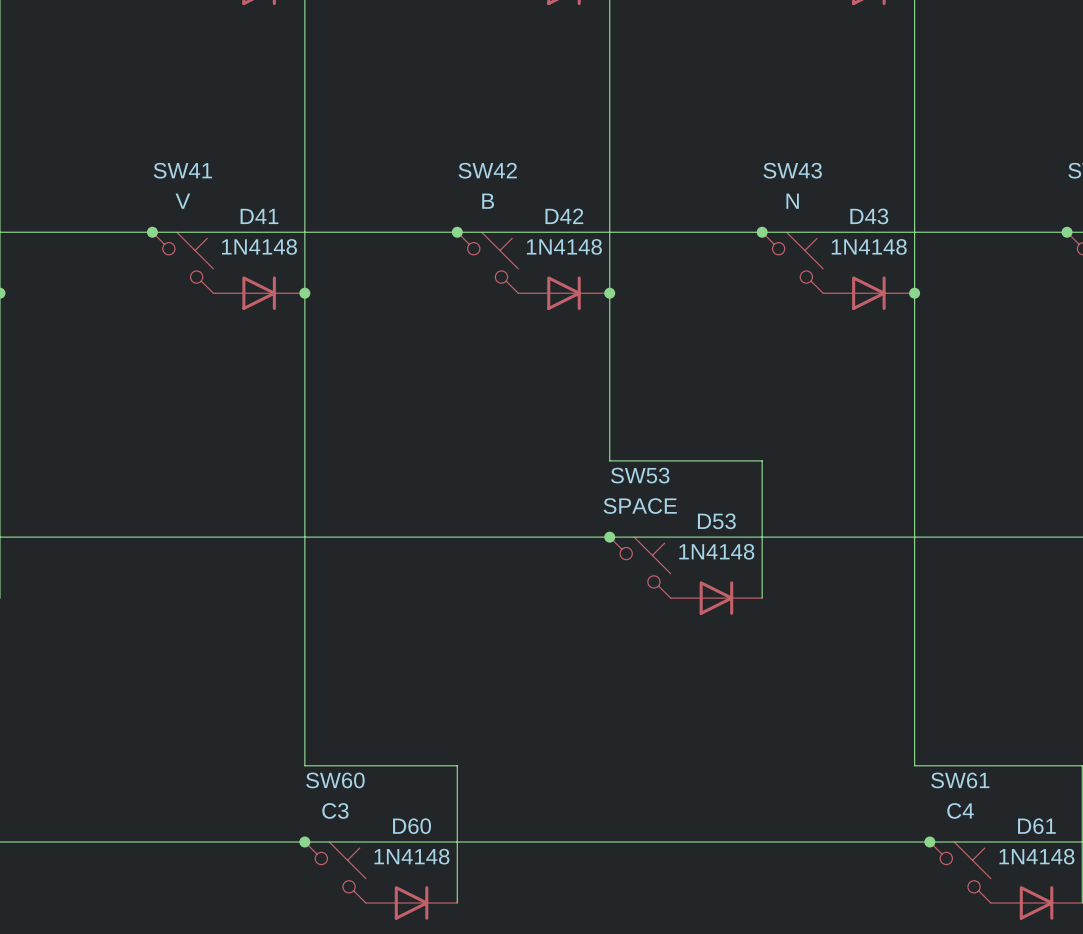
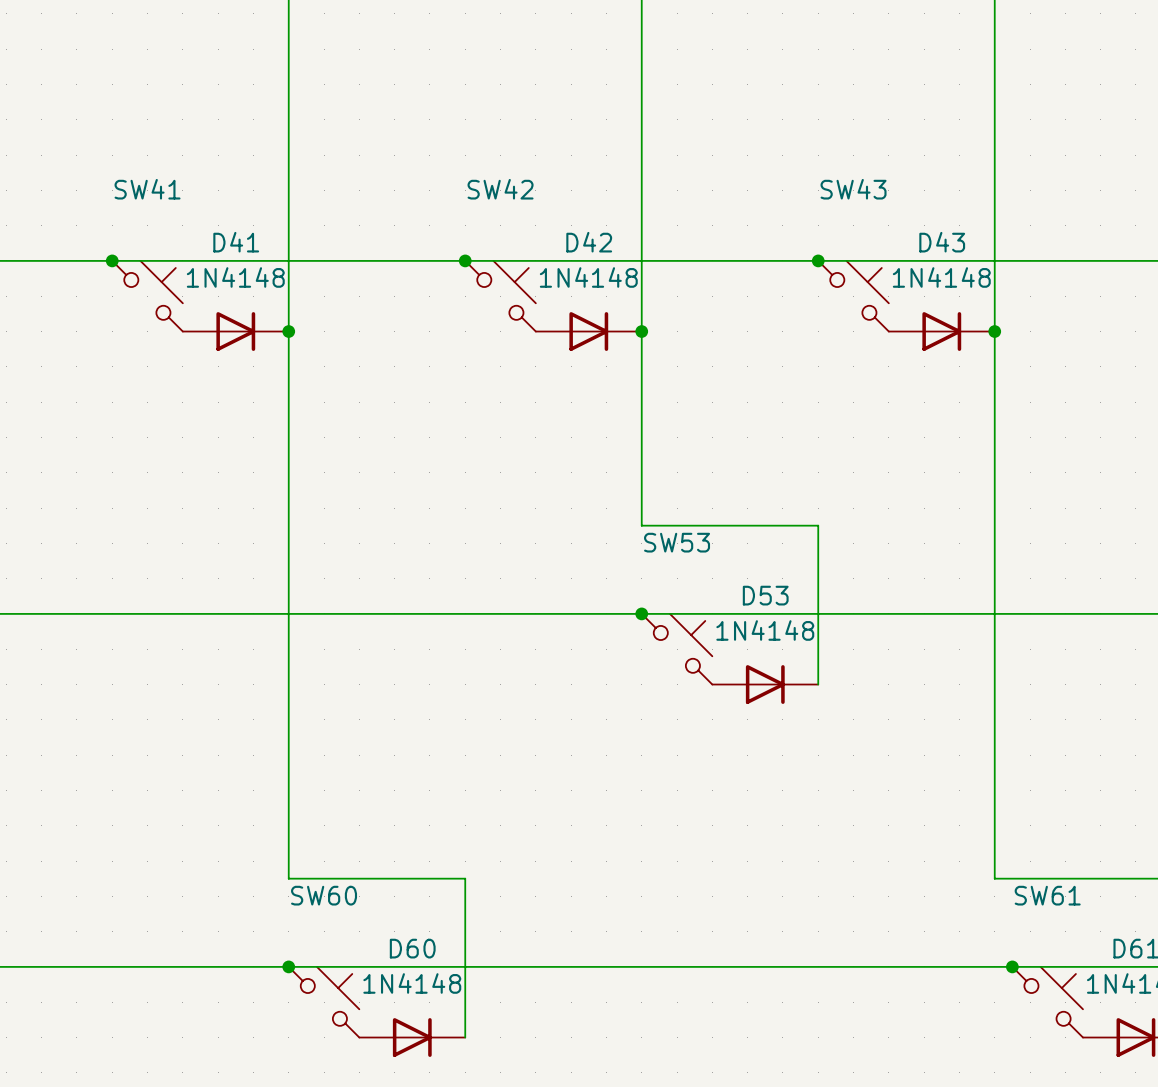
SW41 value: V (182, 201) -> none
SW42 value: B (488, 201) -> none
SW43 value: N (792, 201) -> none
SW53 value: SPACE (640, 506) -> none
SW60 value: C3 (335, 810) -> none
SW61 value: C4 (960, 810) -> none

